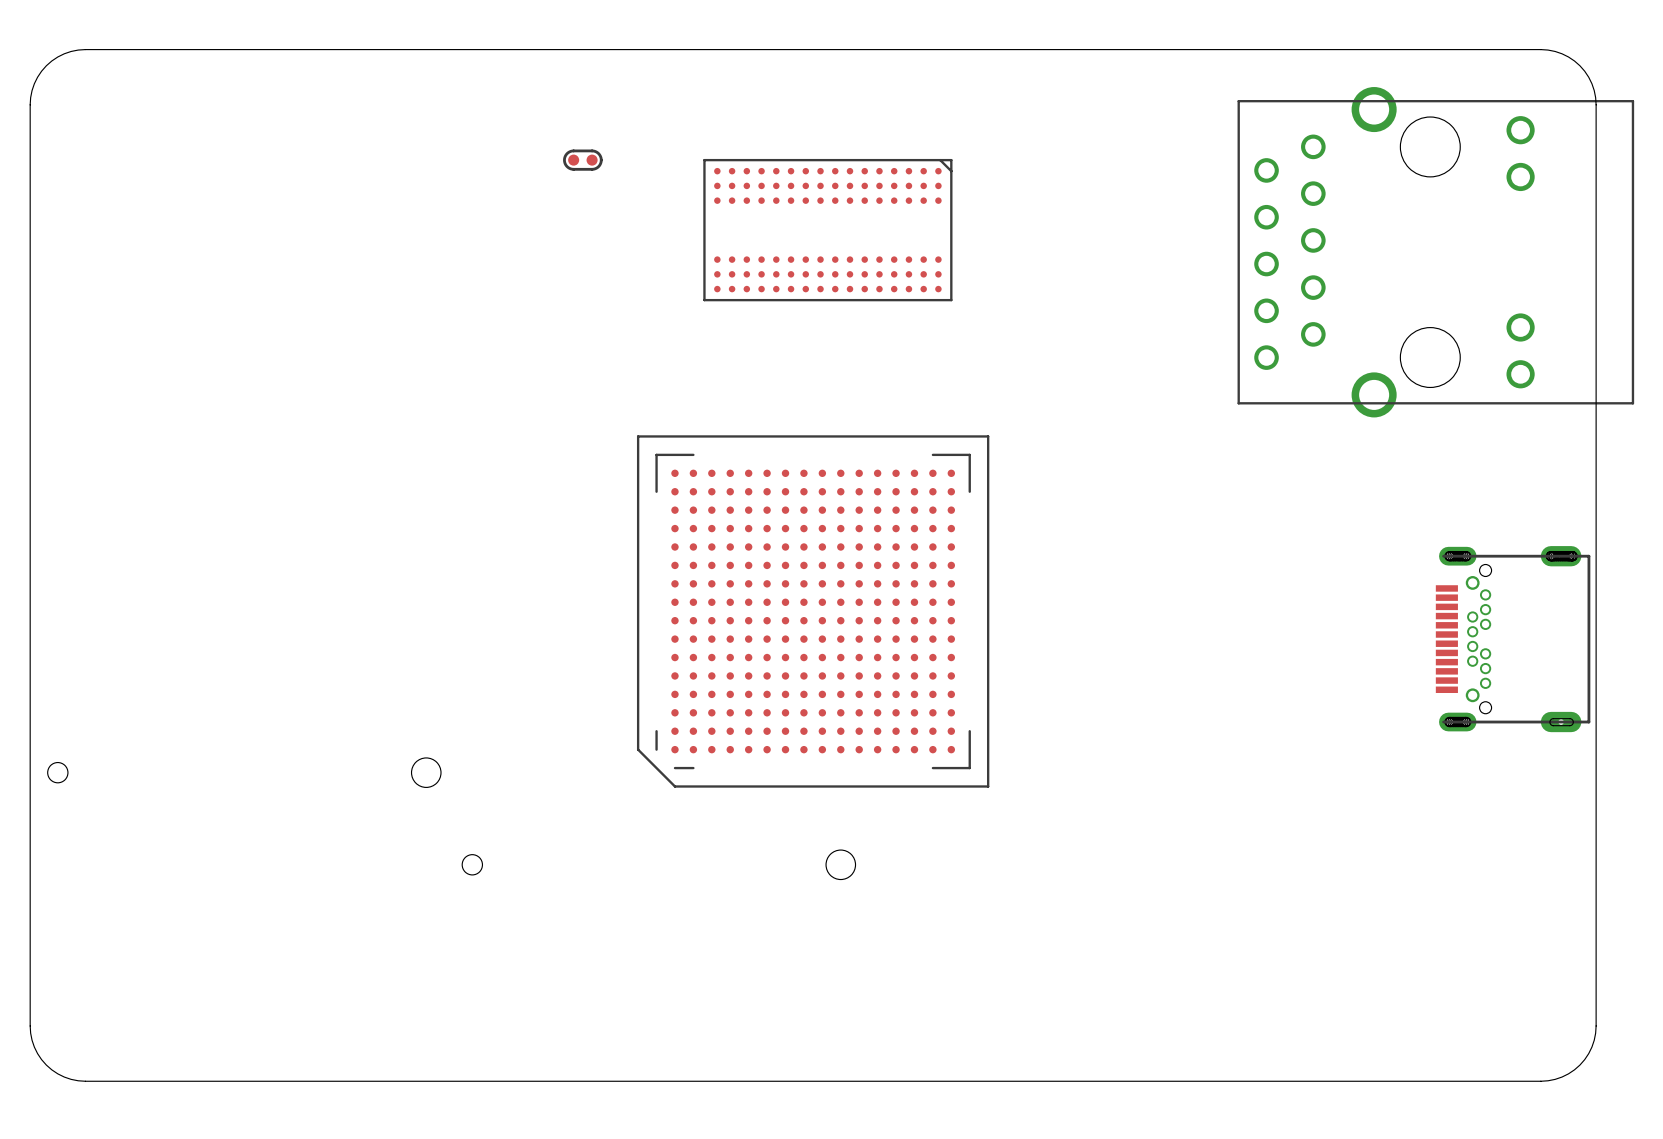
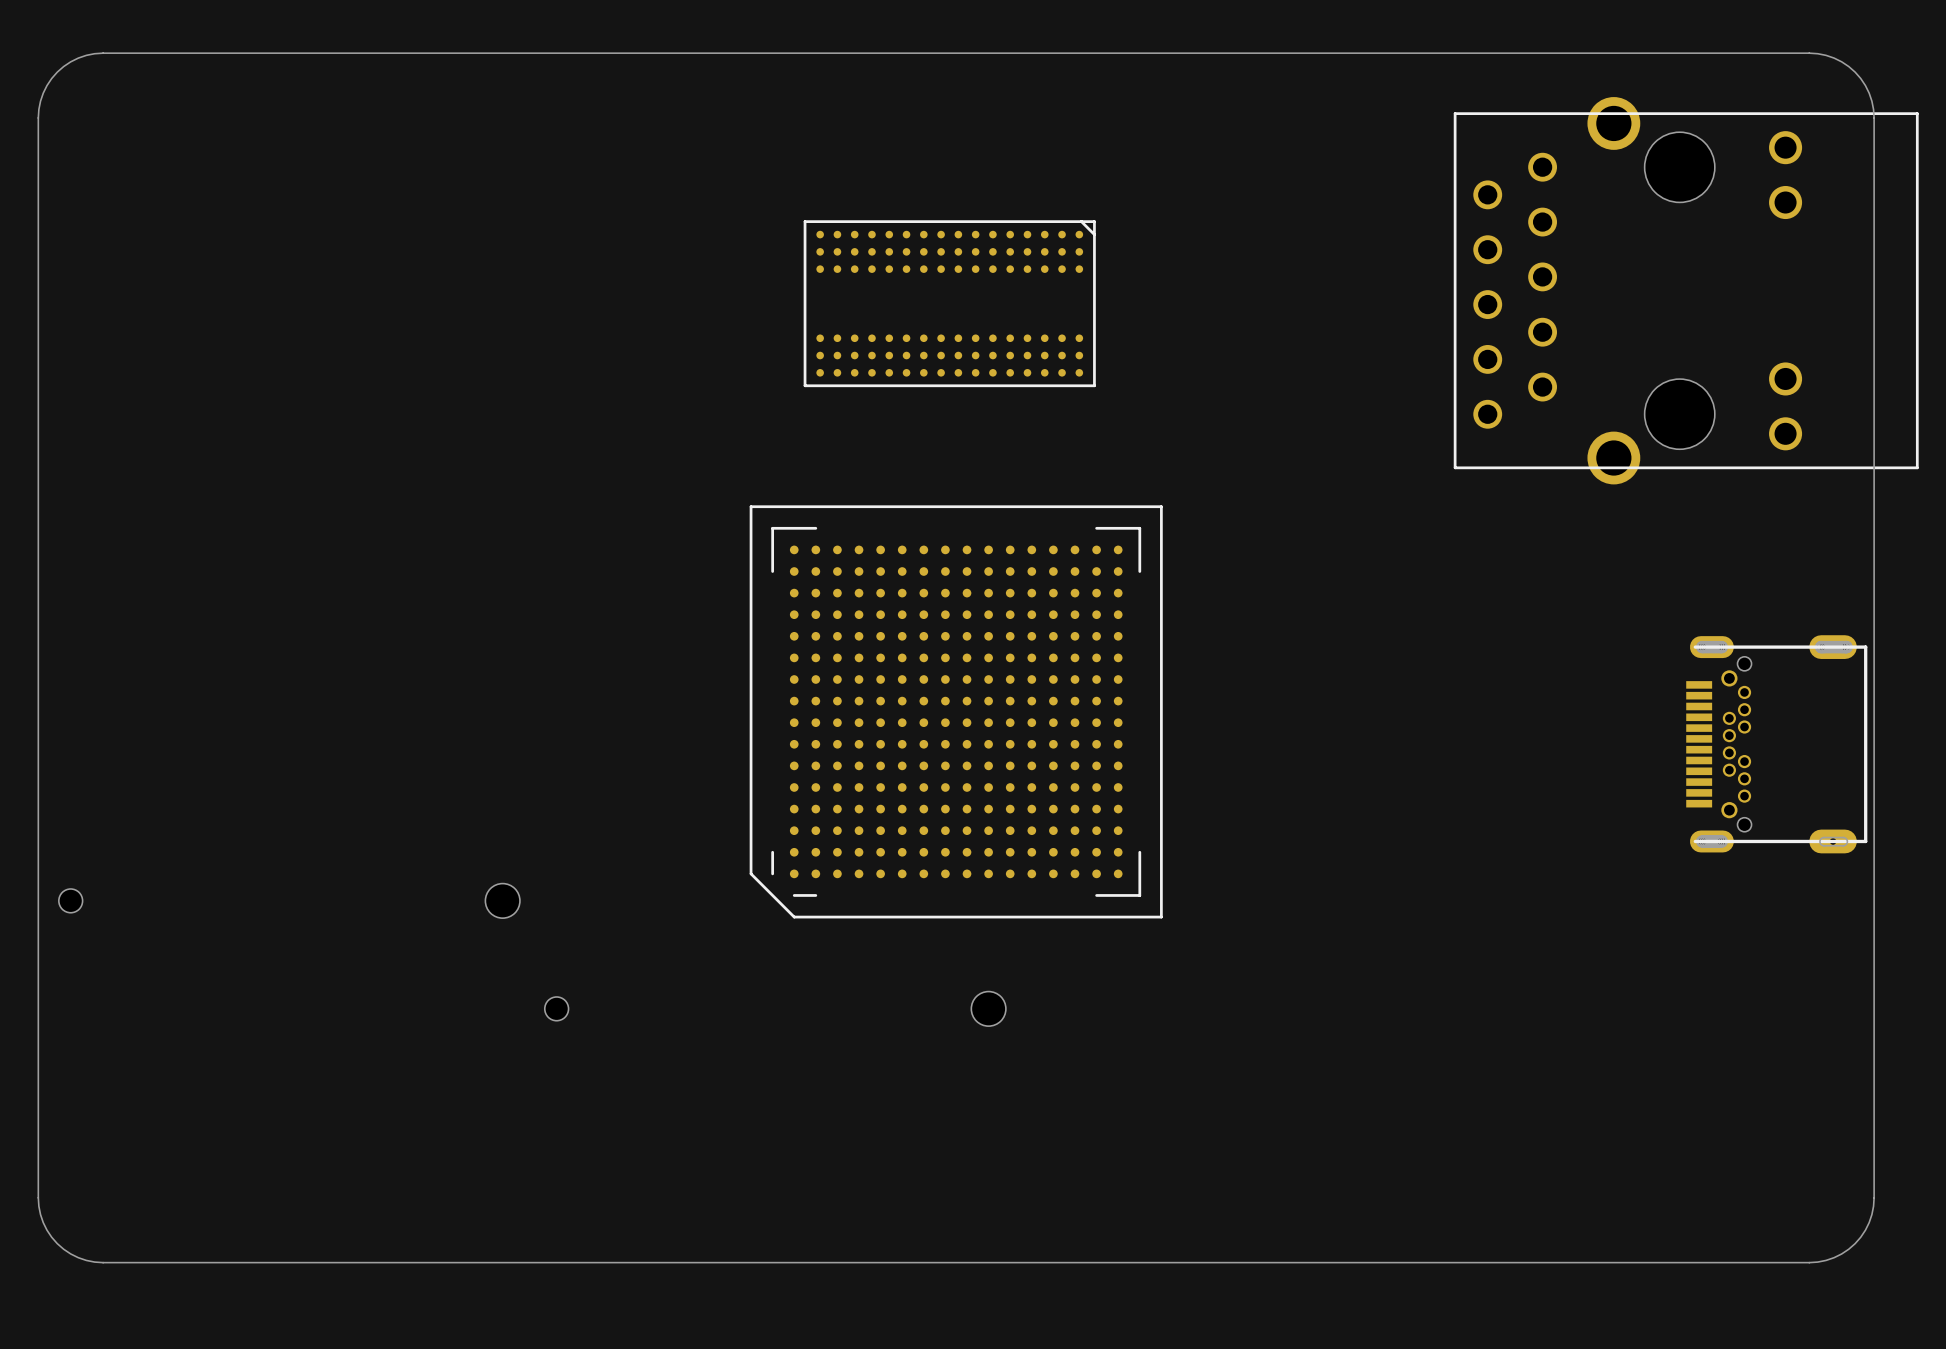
part: (582, 160) -> none
part position: (827, 230) -> (949, 303)

